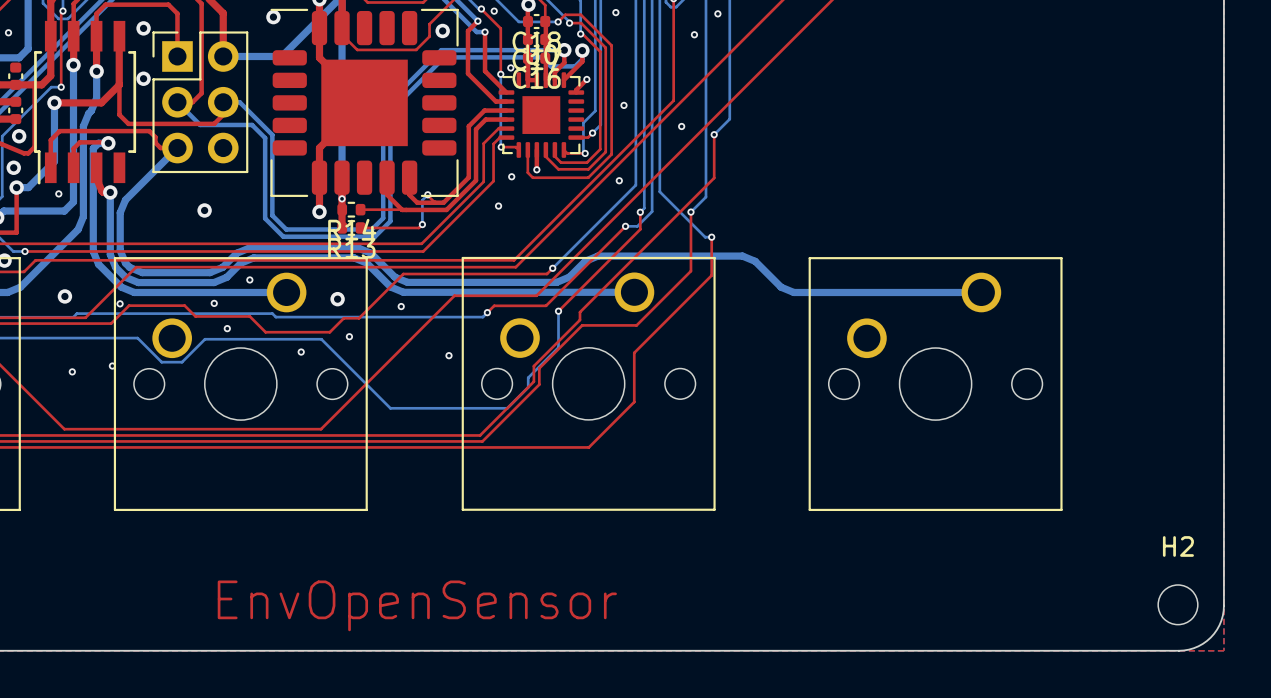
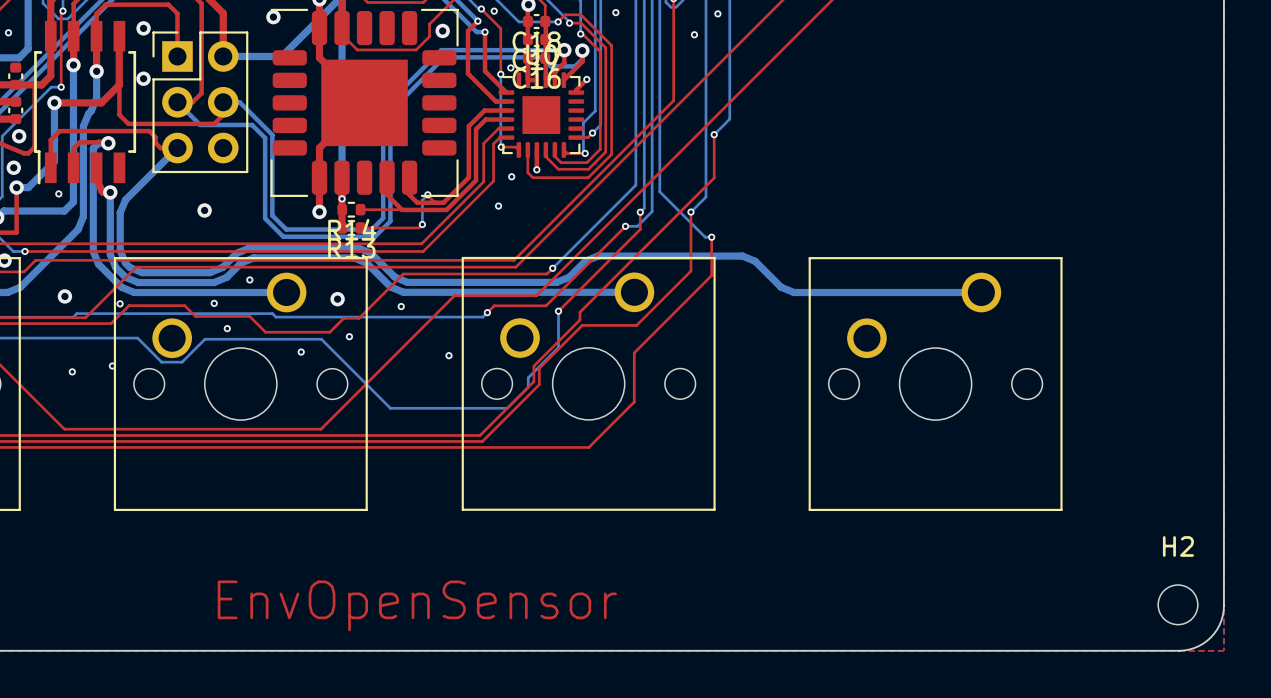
via: (623, 105) -> none
via: (681, 126) -> none
via: (619, 180) -> none

